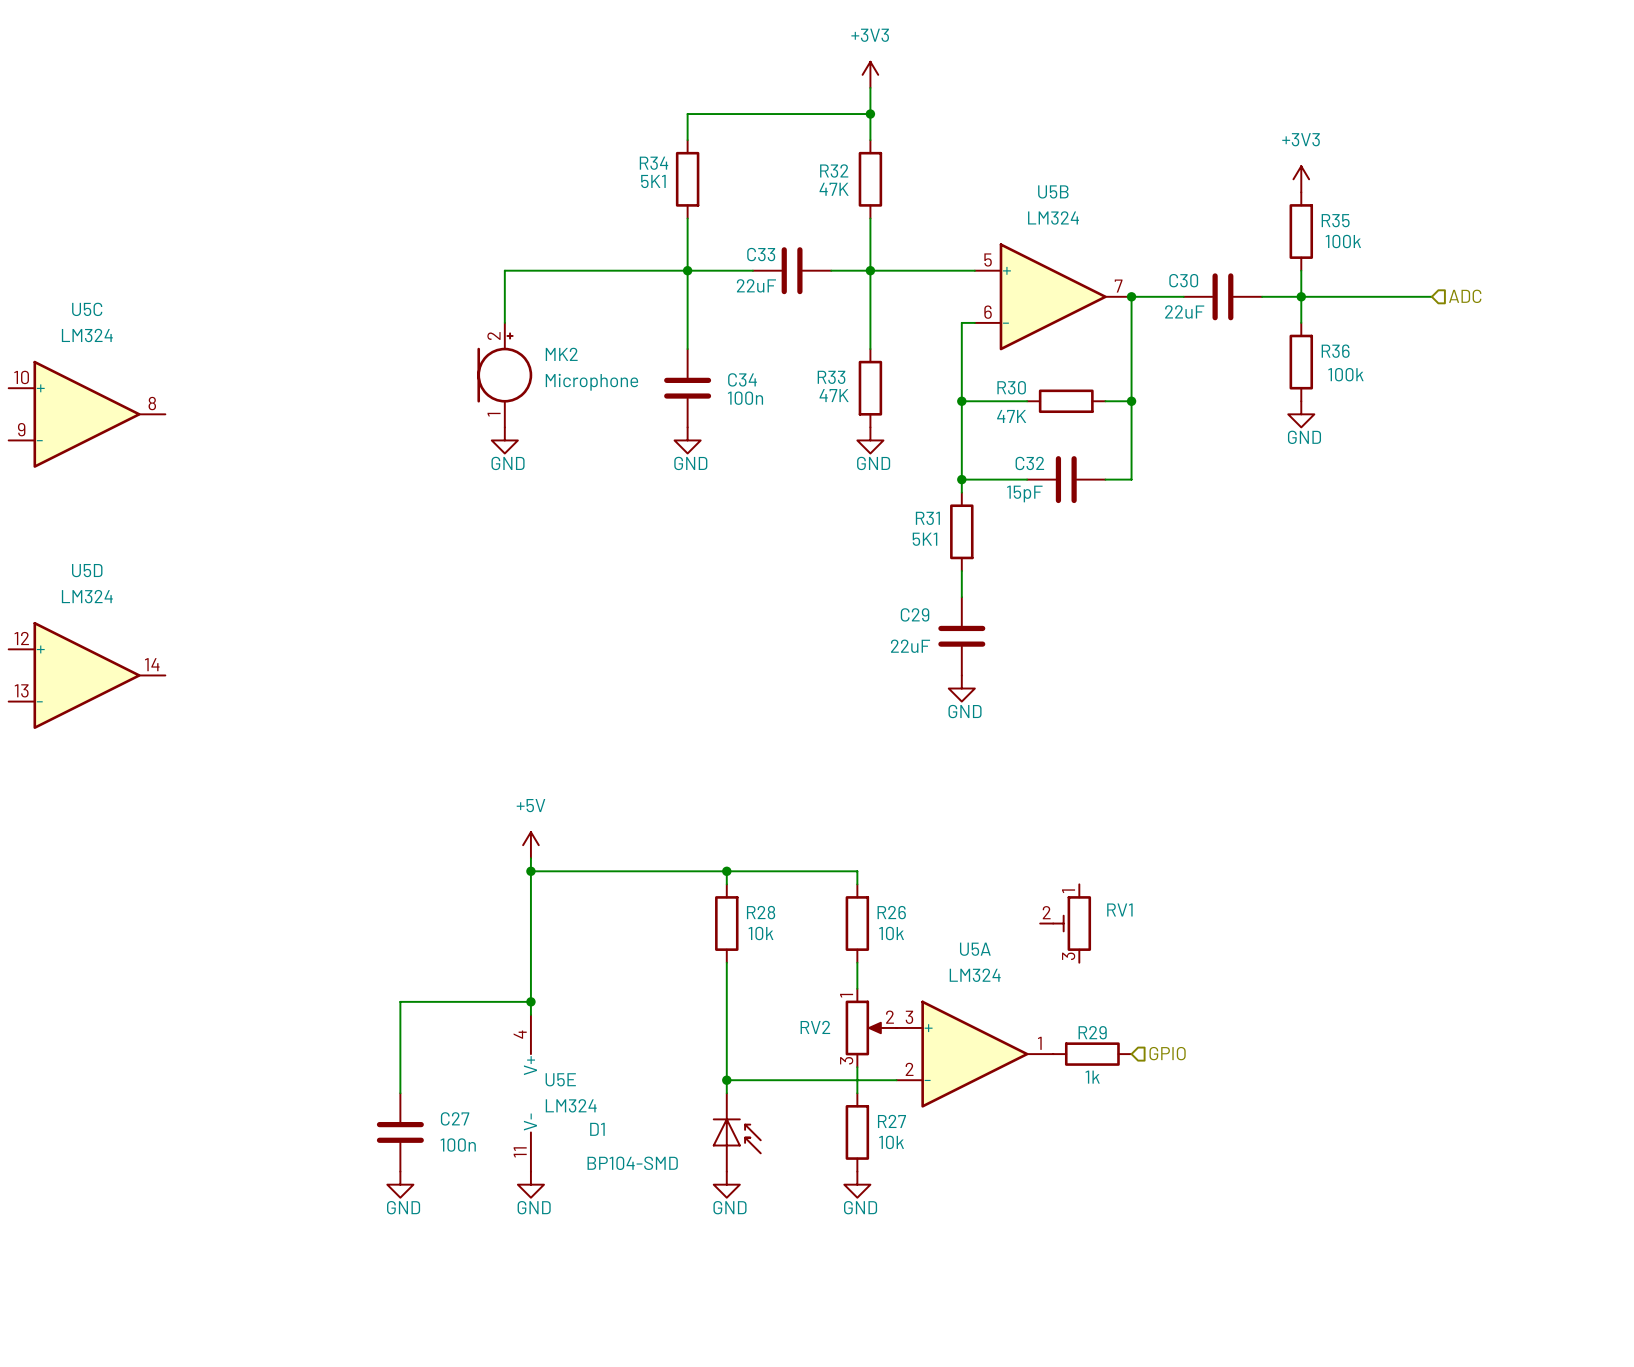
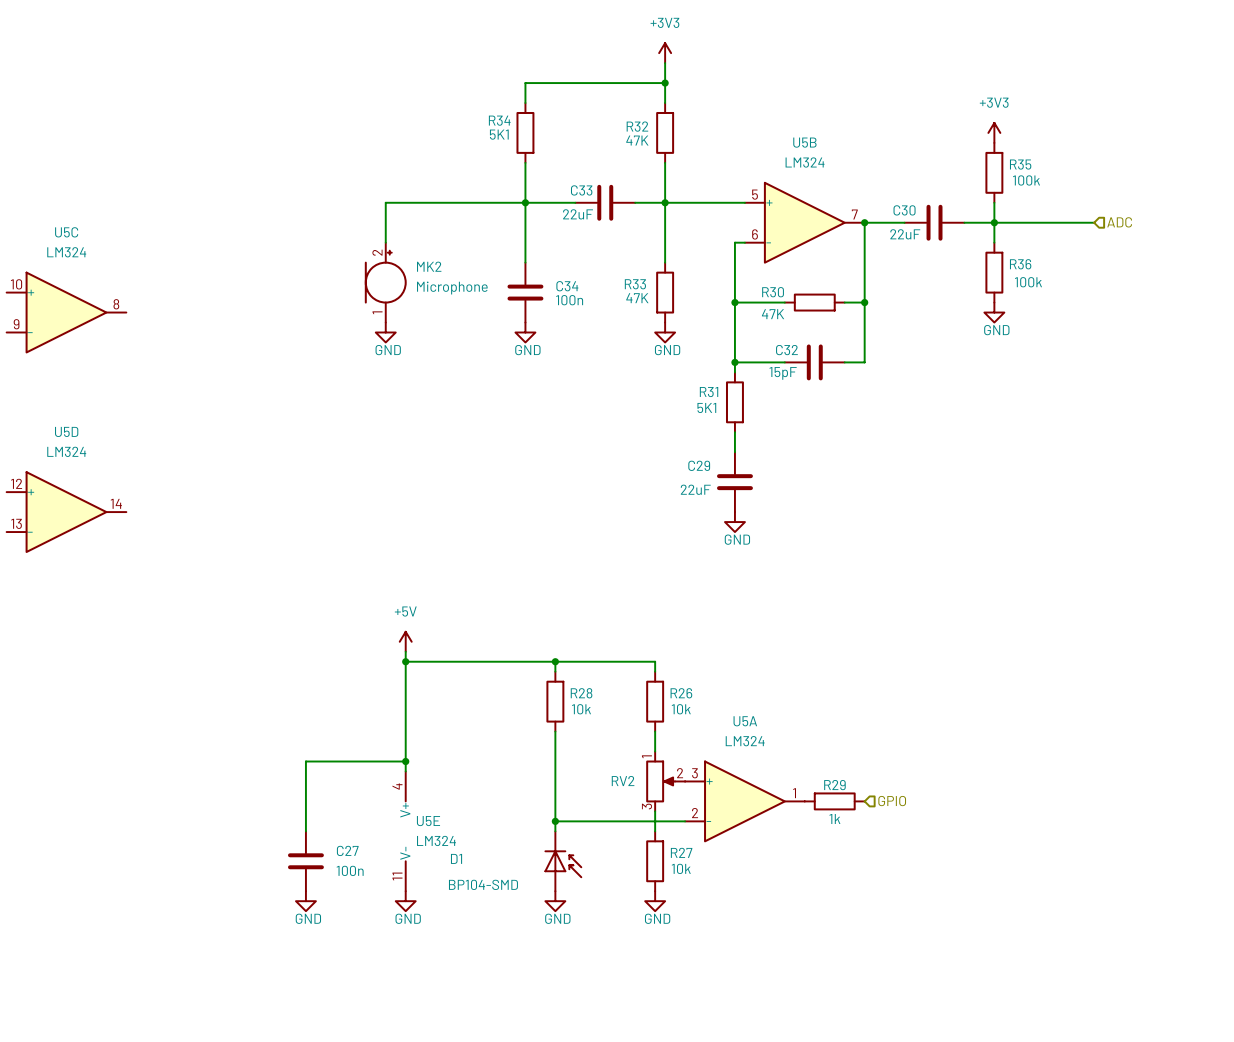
RV1: (1065, 923) -> none

